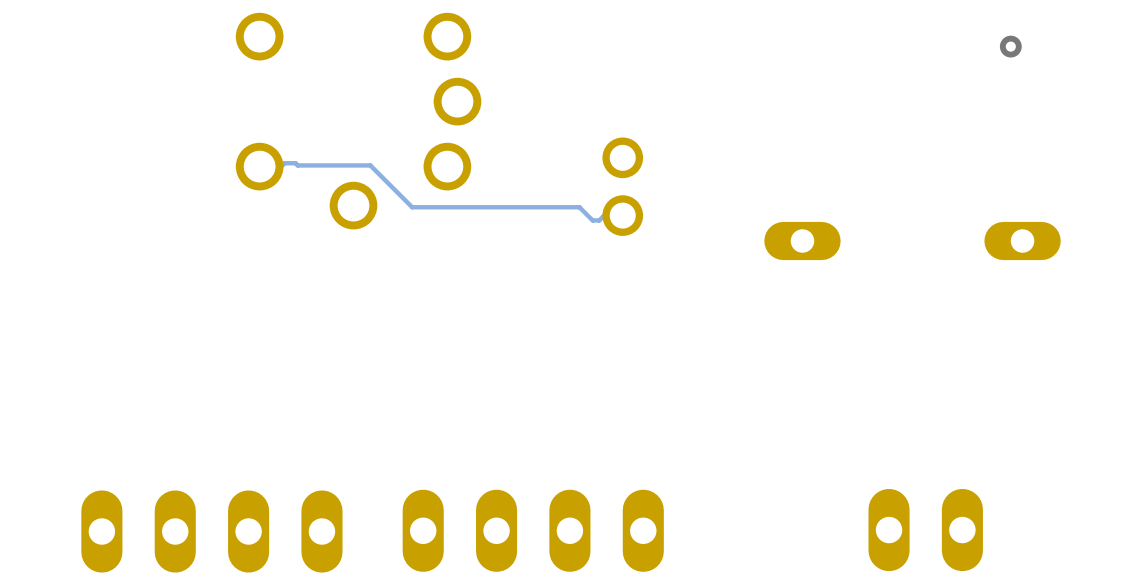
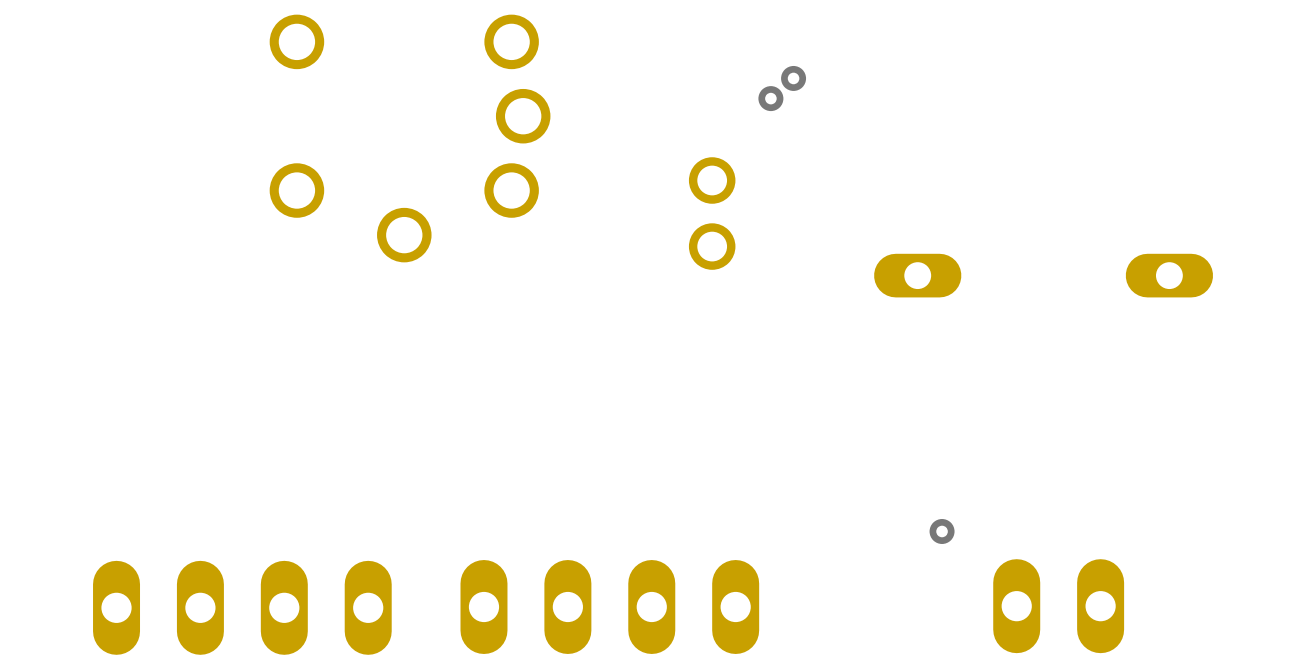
via: (1010, 46) -> none
via: none -> (793, 78)
via: none -> (770, 98)
track: (259, 166) (282, 165) (284, 163) (295, 163) (297, 165) (370, 165) (412, 207) (579, 207) (592, 220) (599, 220) (603, 216) (622, 215) -> none
via: none -> (942, 531)

